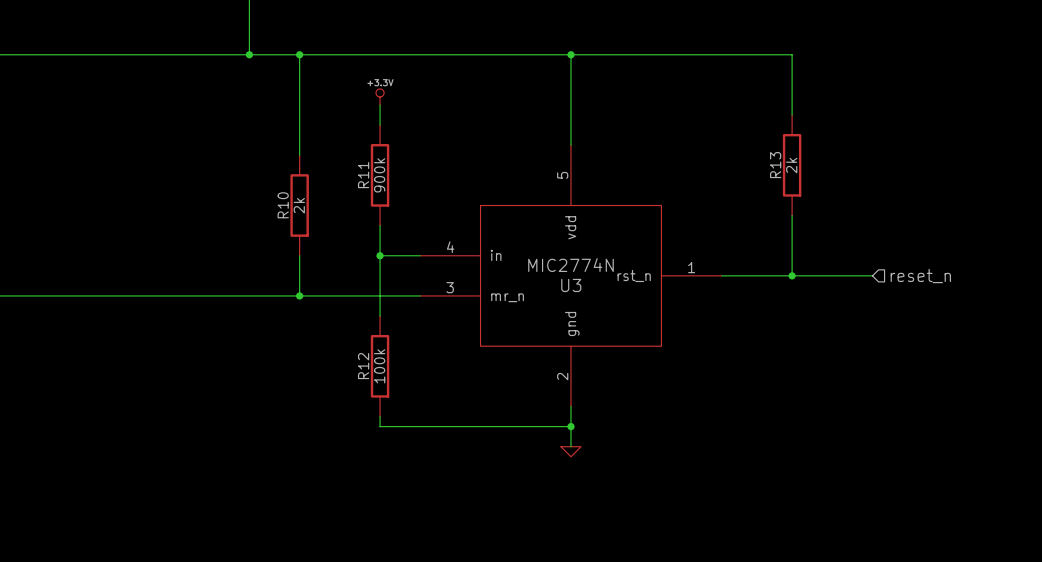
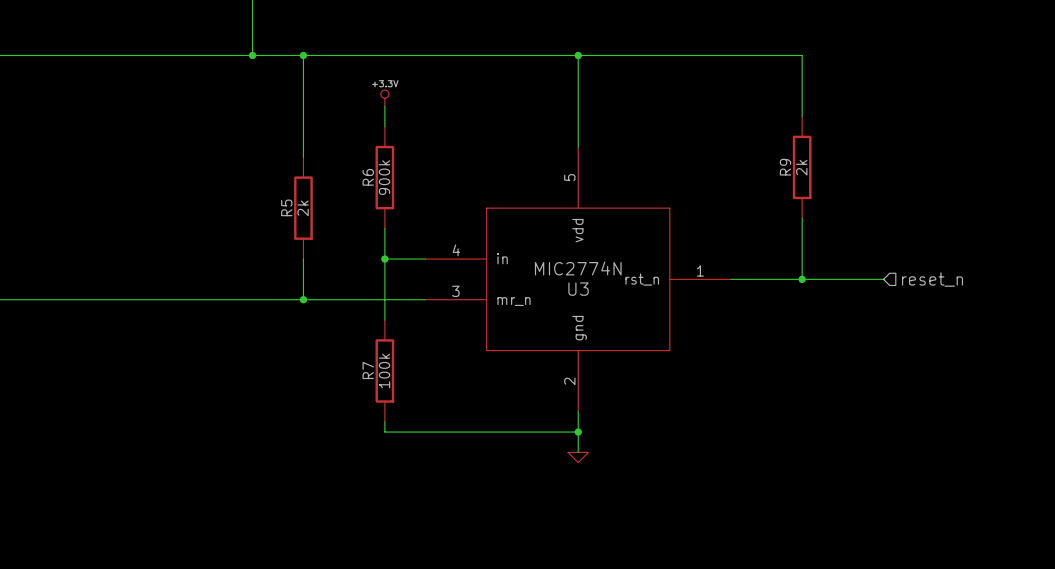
R13 name: R13 (775, 165) -> R9 (785, 167)
R11 name: R11 (363, 175) -> R6 (368, 177)
R10 name: R10 (283, 205) -> R5 (286, 207)
R12 name: R12 (363, 366) -> R7 (368, 370)

